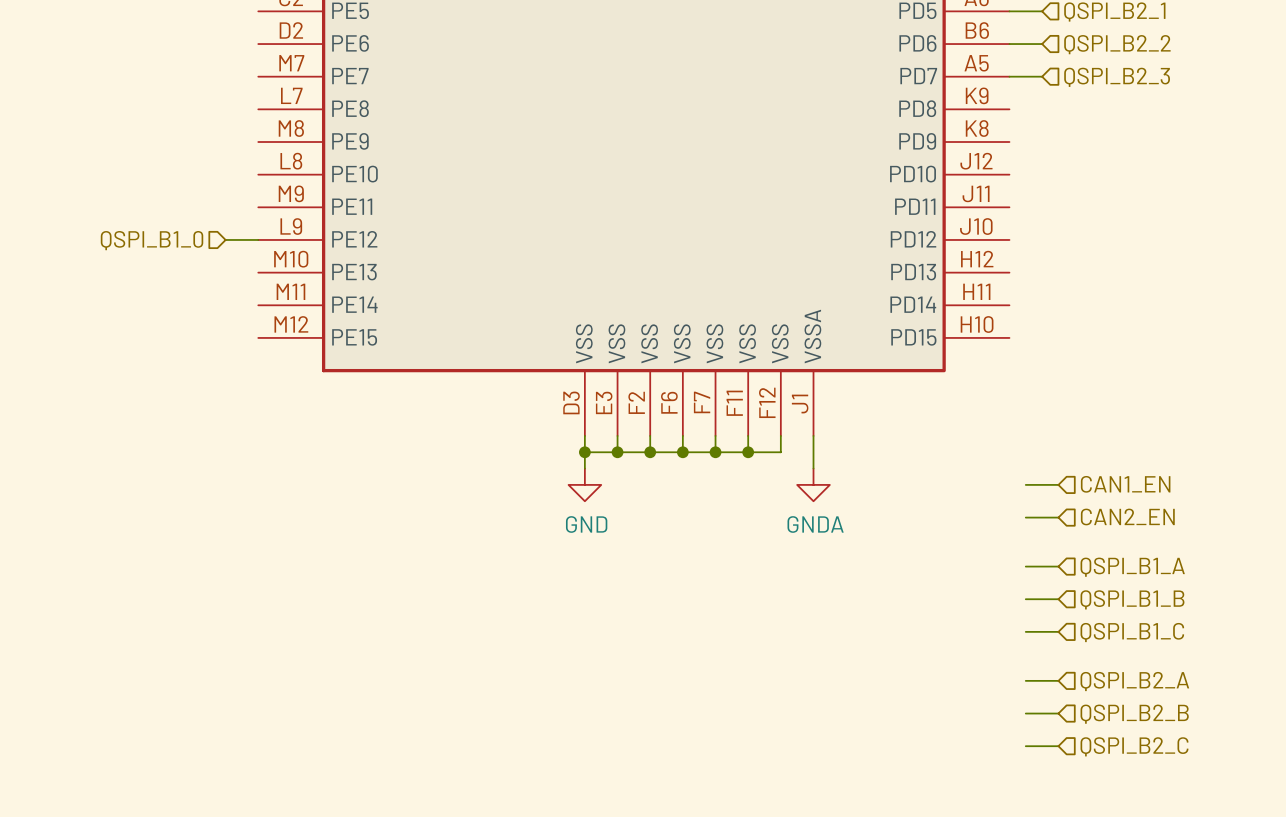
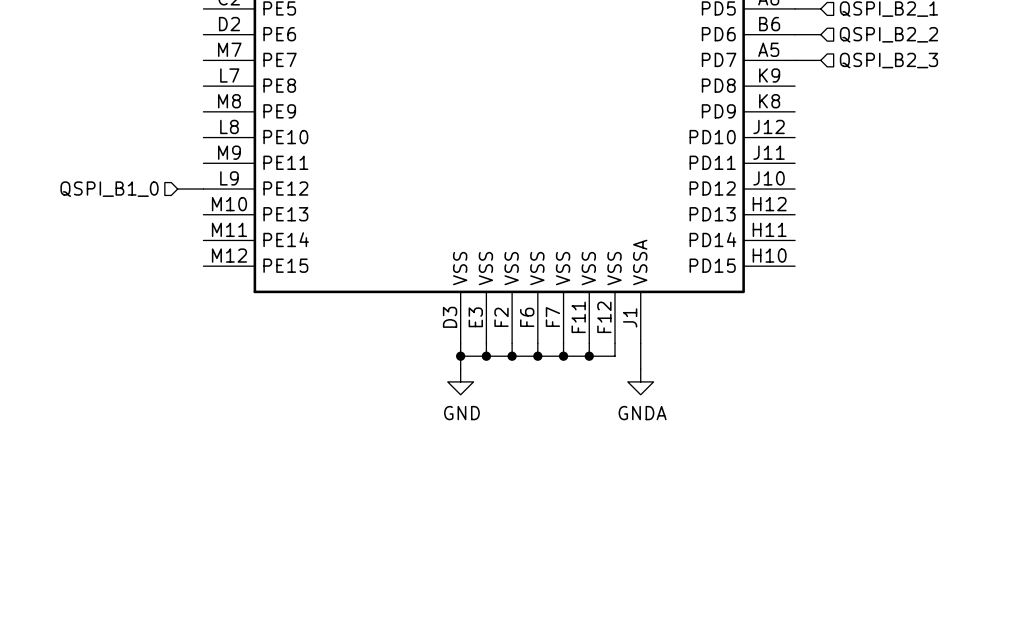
wire: (1025, 484) (1058, 484) -> none
hierarchical label: CAN1_EN (1125, 484) -> none
hierarchical label: CAN2_EN (1127, 516) -> none
wire: (1025, 517) (1058, 517) -> none
wire: (1025, 566) (1058, 566) -> none
hierarchical label: QSPI_B1_A (1132, 567) -> none
wire: (1025, 599) (1058, 599) -> none
hierarchical label: QSPI_B1_B (1132, 599) -> none
wire: (1025, 631) (1058, 631) -> none
hierarchical label: QSPI_B1_C (1132, 632) -> none
wire: (1025, 680) (1058, 680) -> none
hierarchical label: QSPI_B2_A (1134, 681) -> none
wire: (1025, 713) (1058, 713) -> none
hierarchical label: QSPI_B2_B (1134, 714) -> none
wire: (1025, 746) (1058, 746) -> none
hierarchical label: QSPI_B2_C (1134, 746) -> none

